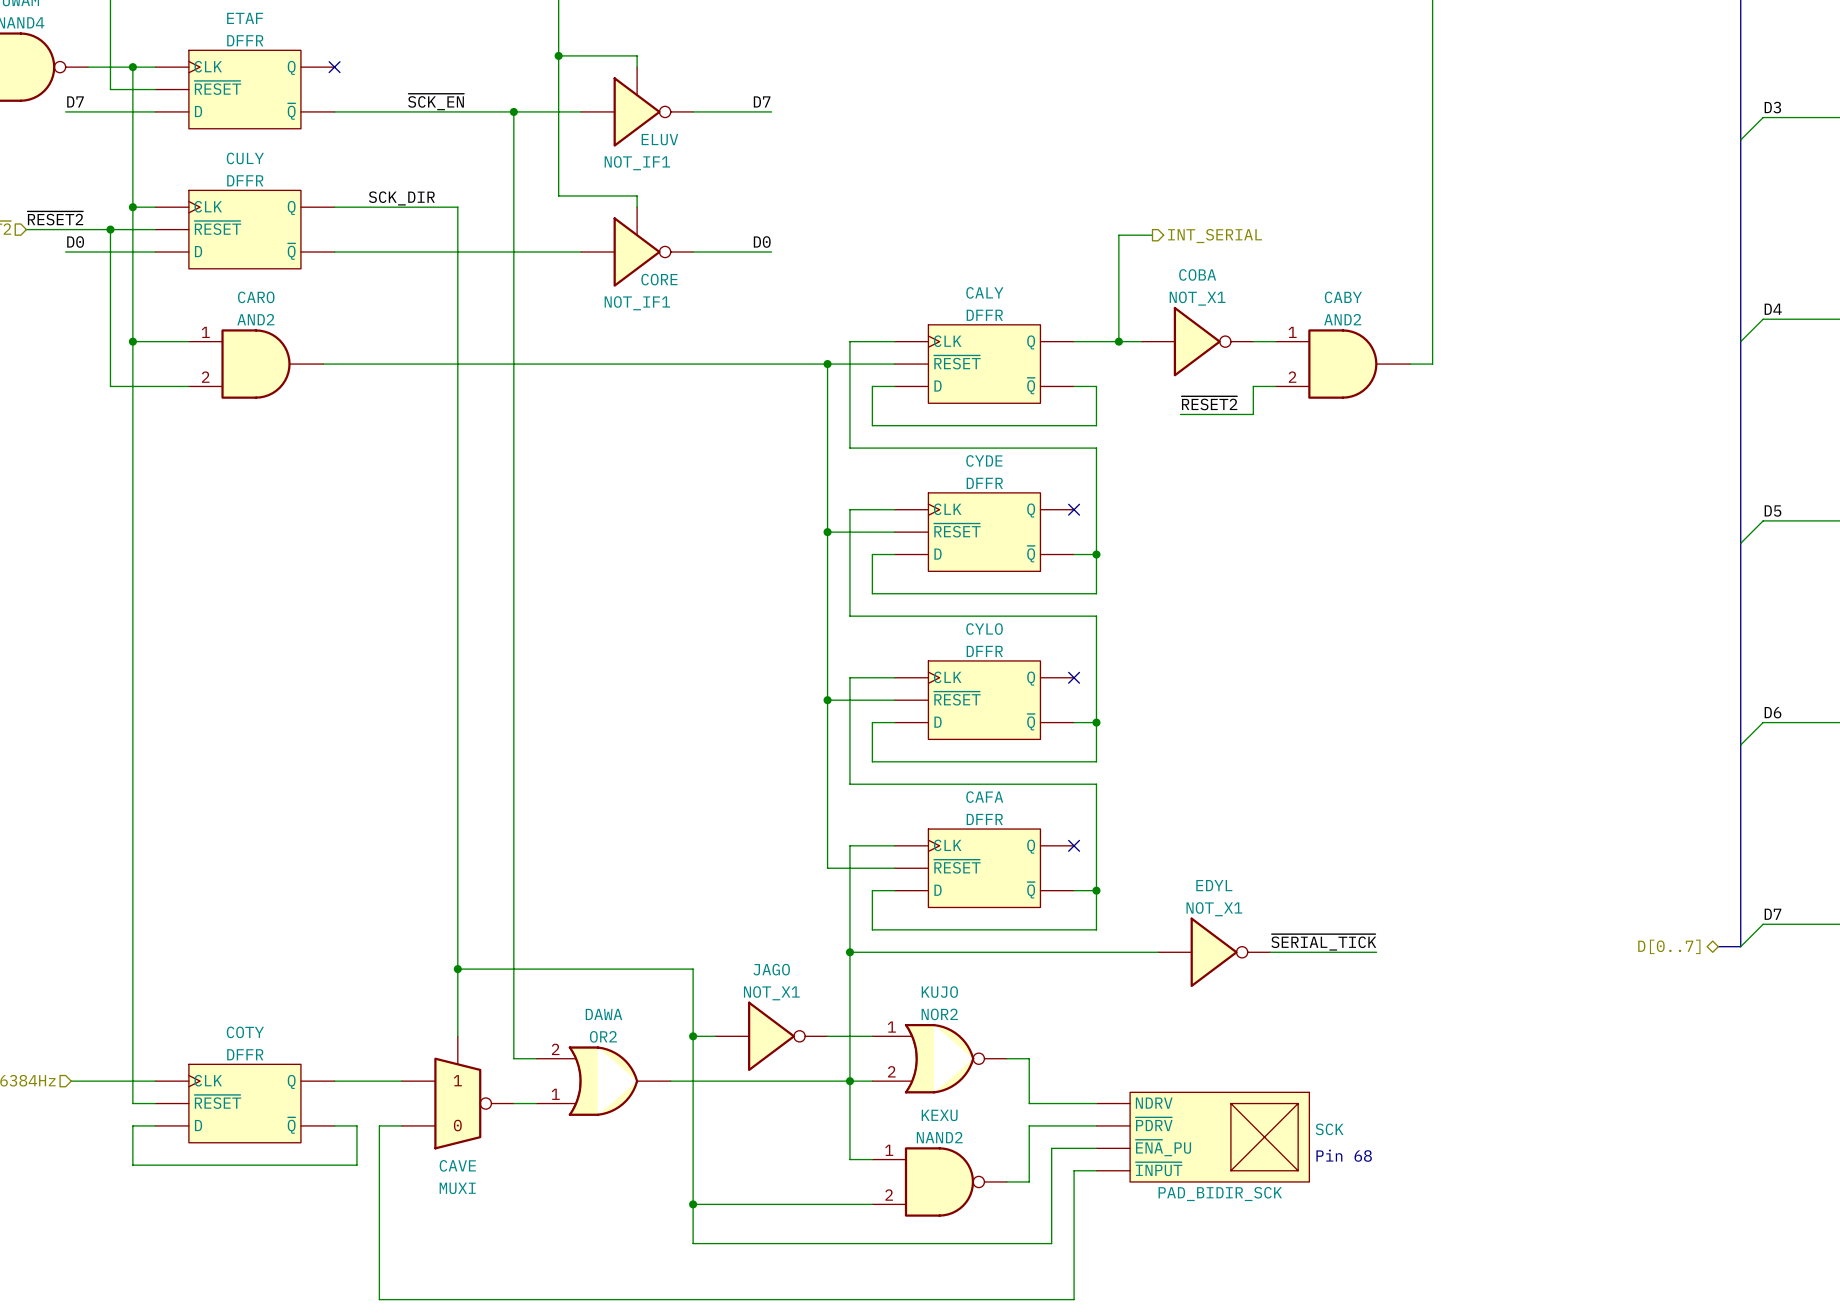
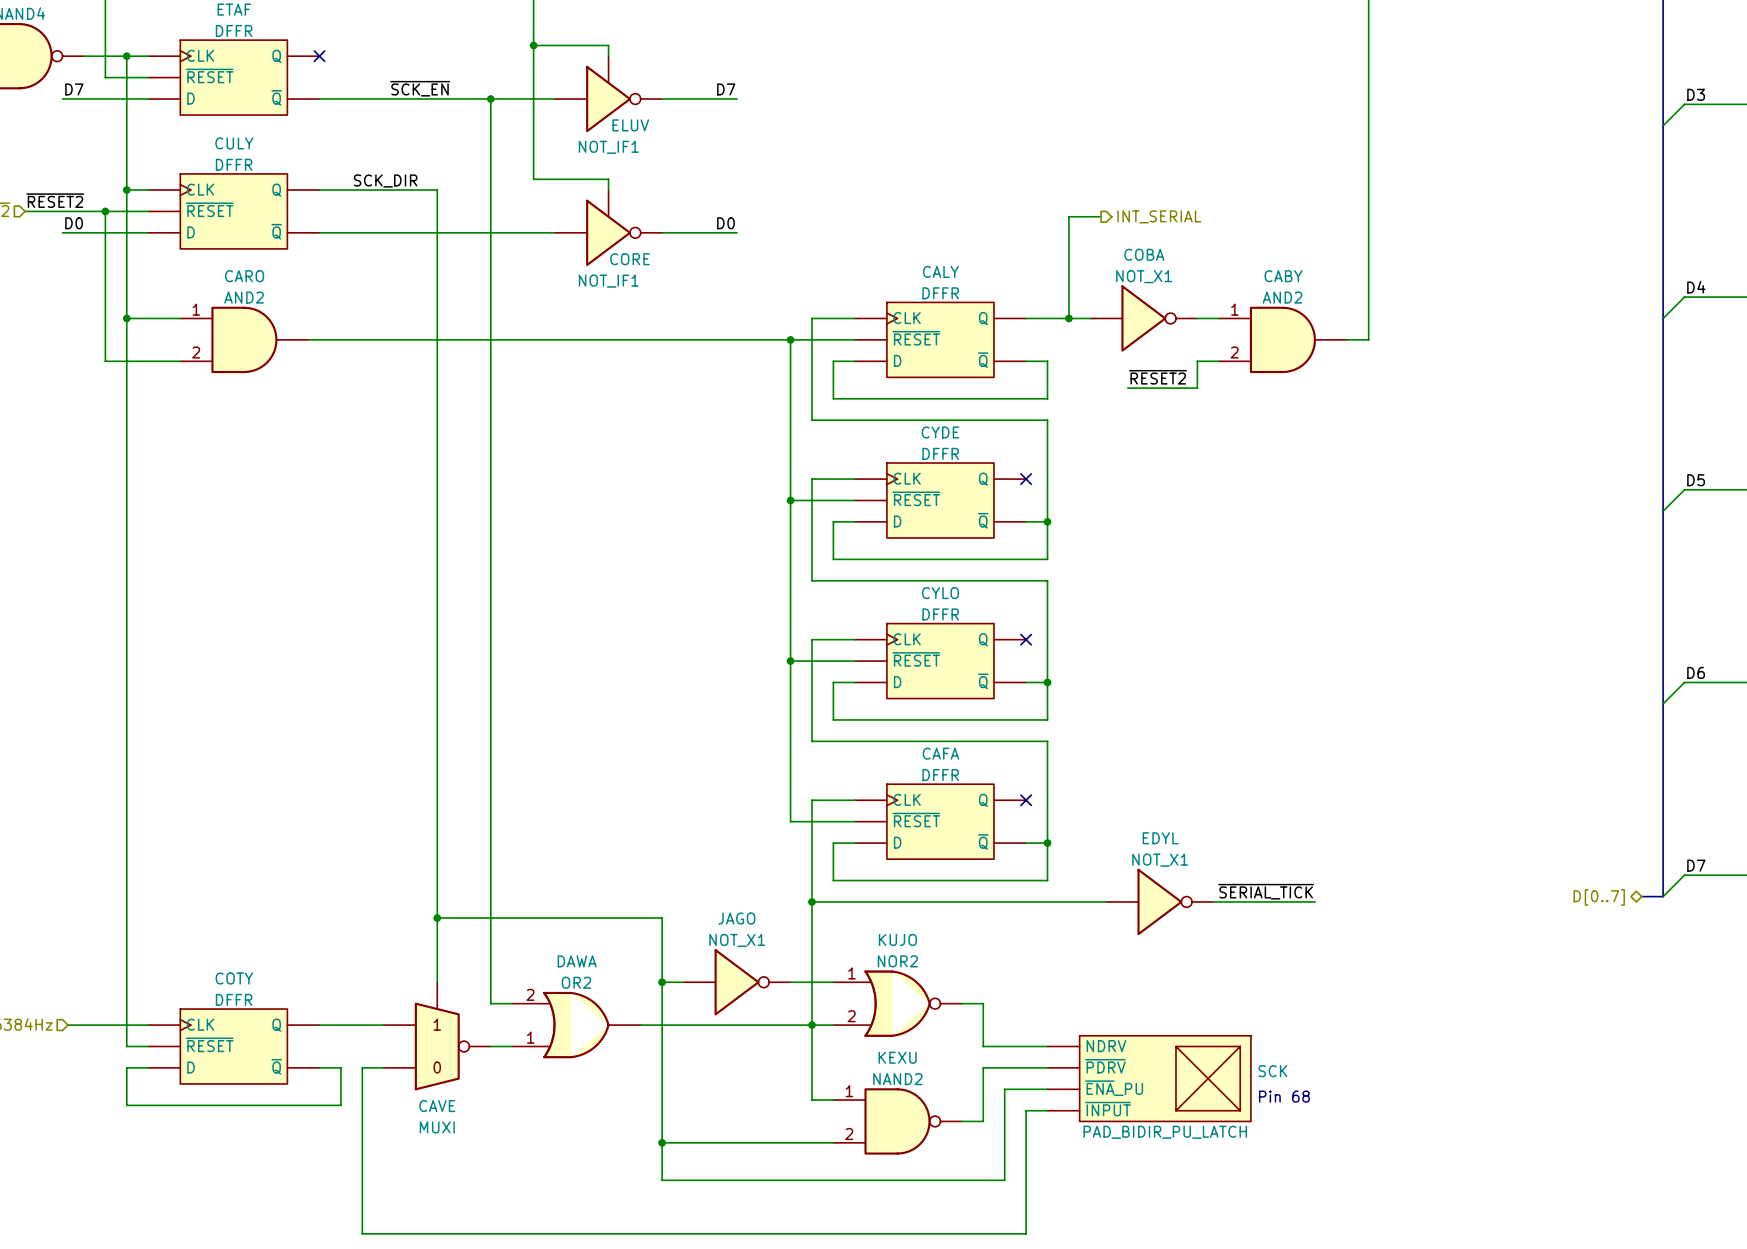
SCK value: PAD_BIDIR_SCK (1220, 1194) -> PAD_BIDIR_PU_LATCH (1165, 1132)

